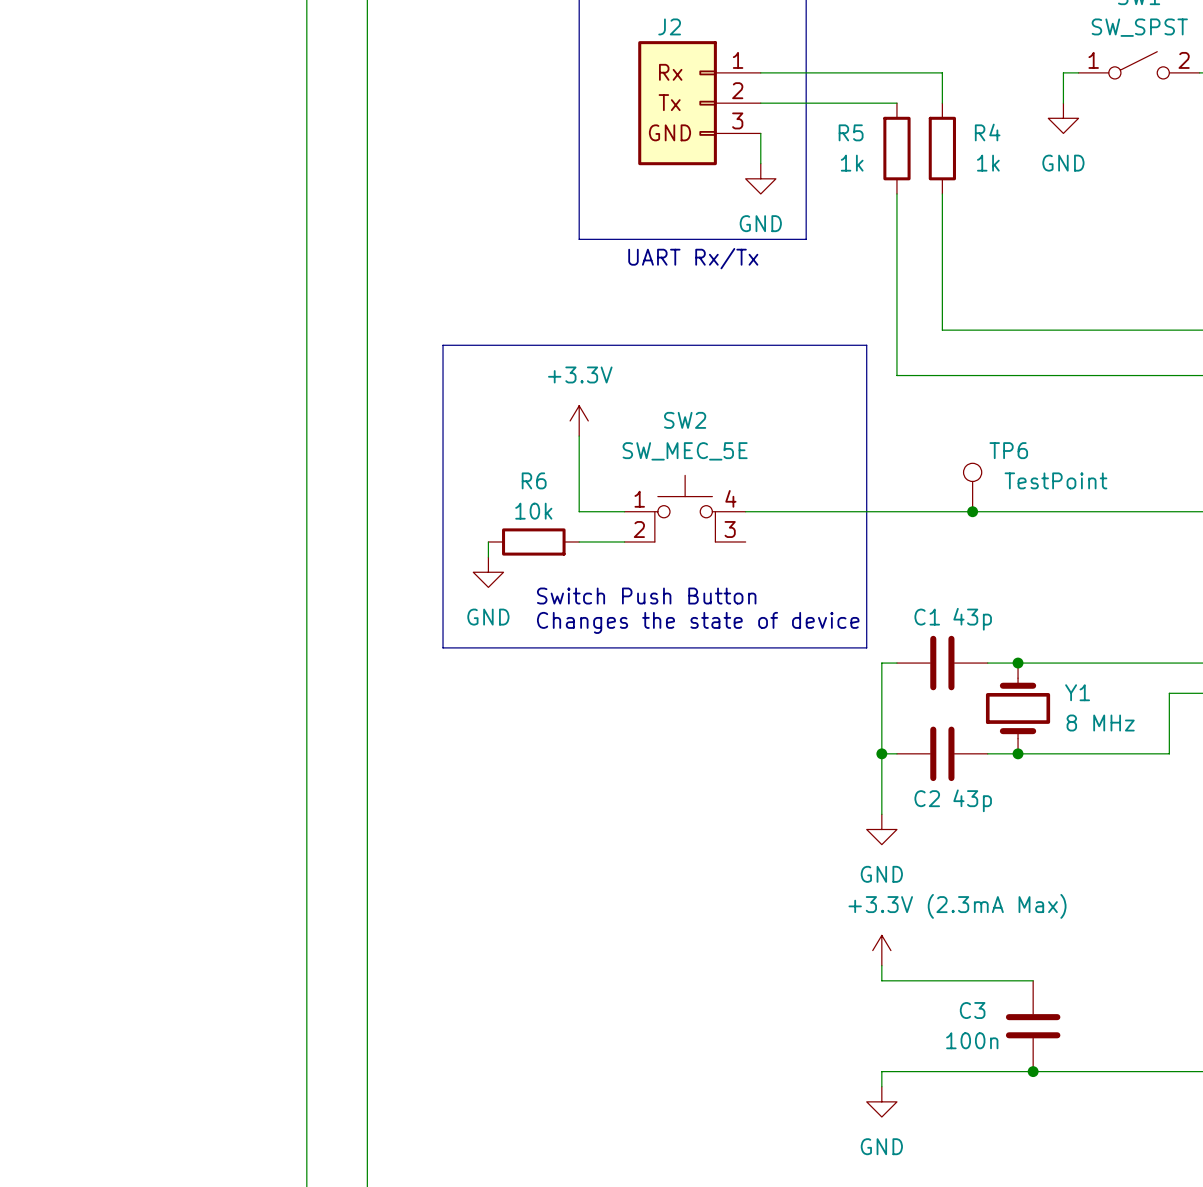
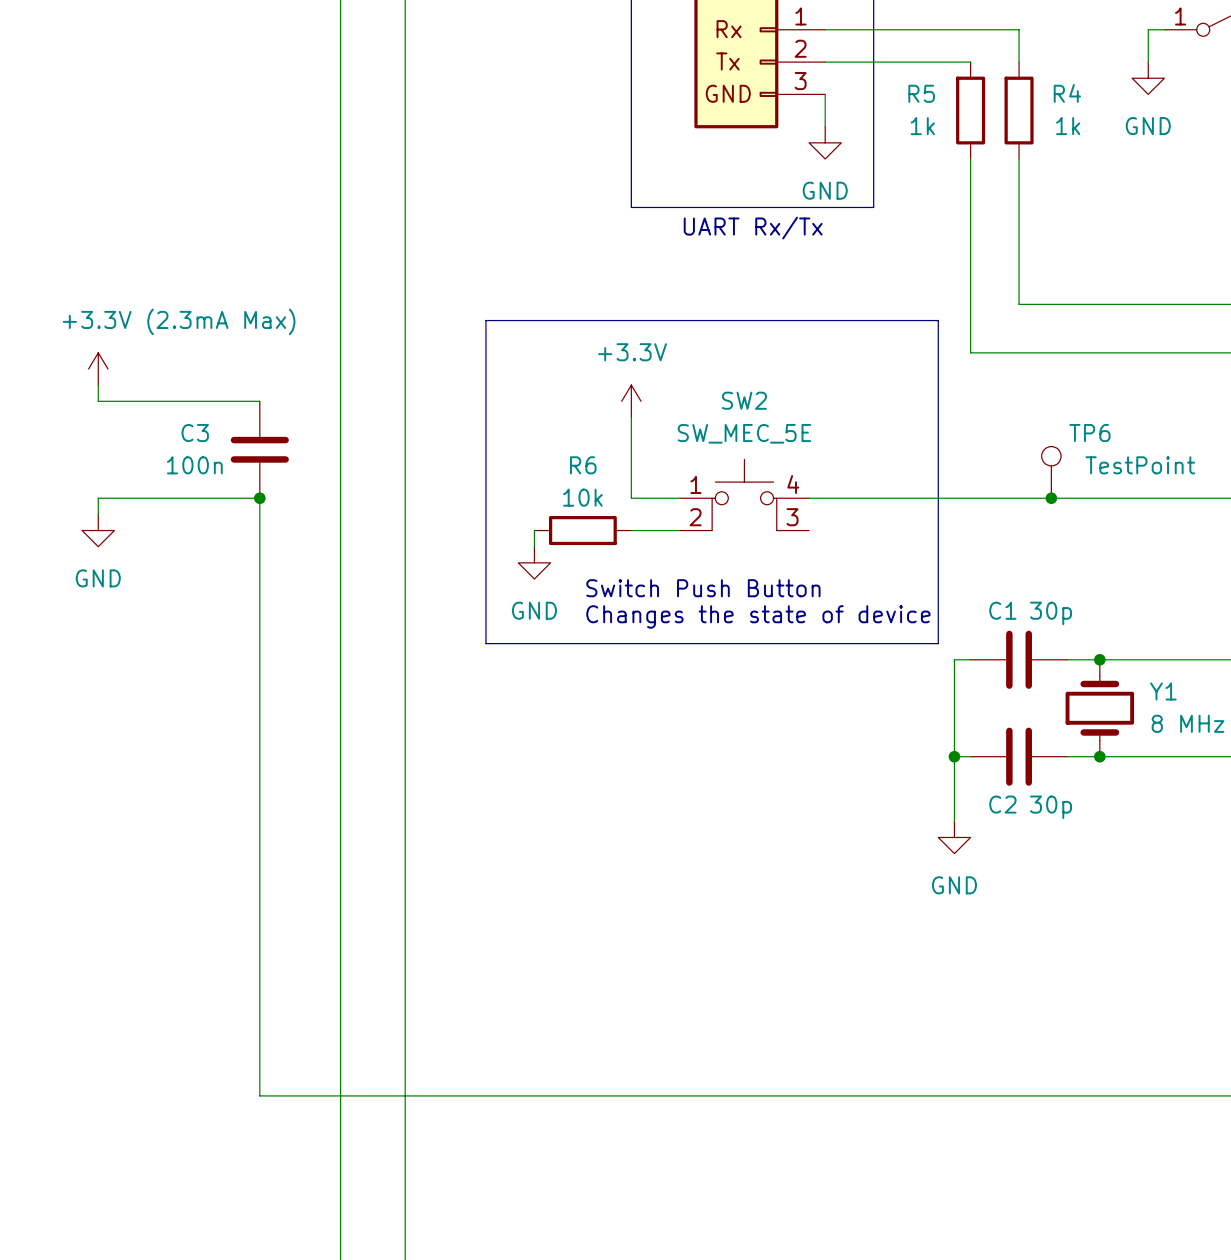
power symbol: none -> +3.3V (2.3mA Max) (98, 369)
wire: none -> (98, 385) (98, 401) (259, 401)
junction: none -> (259, 498)
power symbol: none -> GND (98, 530)
C1 value: 43p (972, 619) -> 30p (1050, 613)
C2 value: 43p (972, 800) -> 30p (1050, 807)
power symbol: +3.3V (2.3mA Max) (881, 950) -> none
wire: (881, 965) (881, 980) (1033, 980) -> none
C3 position: (1033, 1026) -> (259, 449)
wire: (881, 1071) (881, 1086) -> (954, 1095) (259, 1095) (259, 498) (98, 498) (98, 514)
junction: (1033, 1071) -> none
power symbol: GND (881, 1101) -> none

